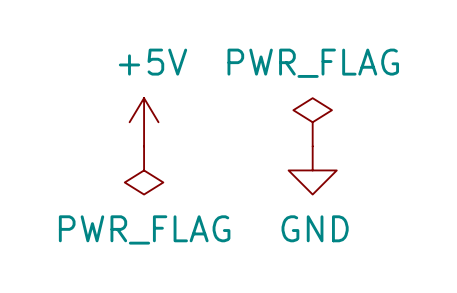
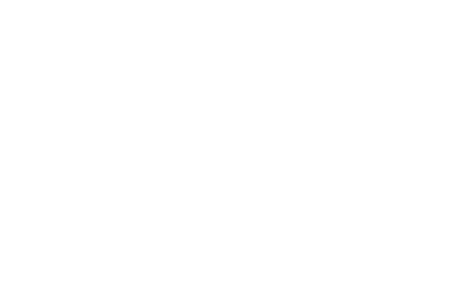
power symbol: +5V (144, 122) -> none
power symbol: PWR_FLAG (312, 122) -> none
power symbol: PWR_FLAG (144, 170) -> none
power symbol: GND (312, 170) -> none

